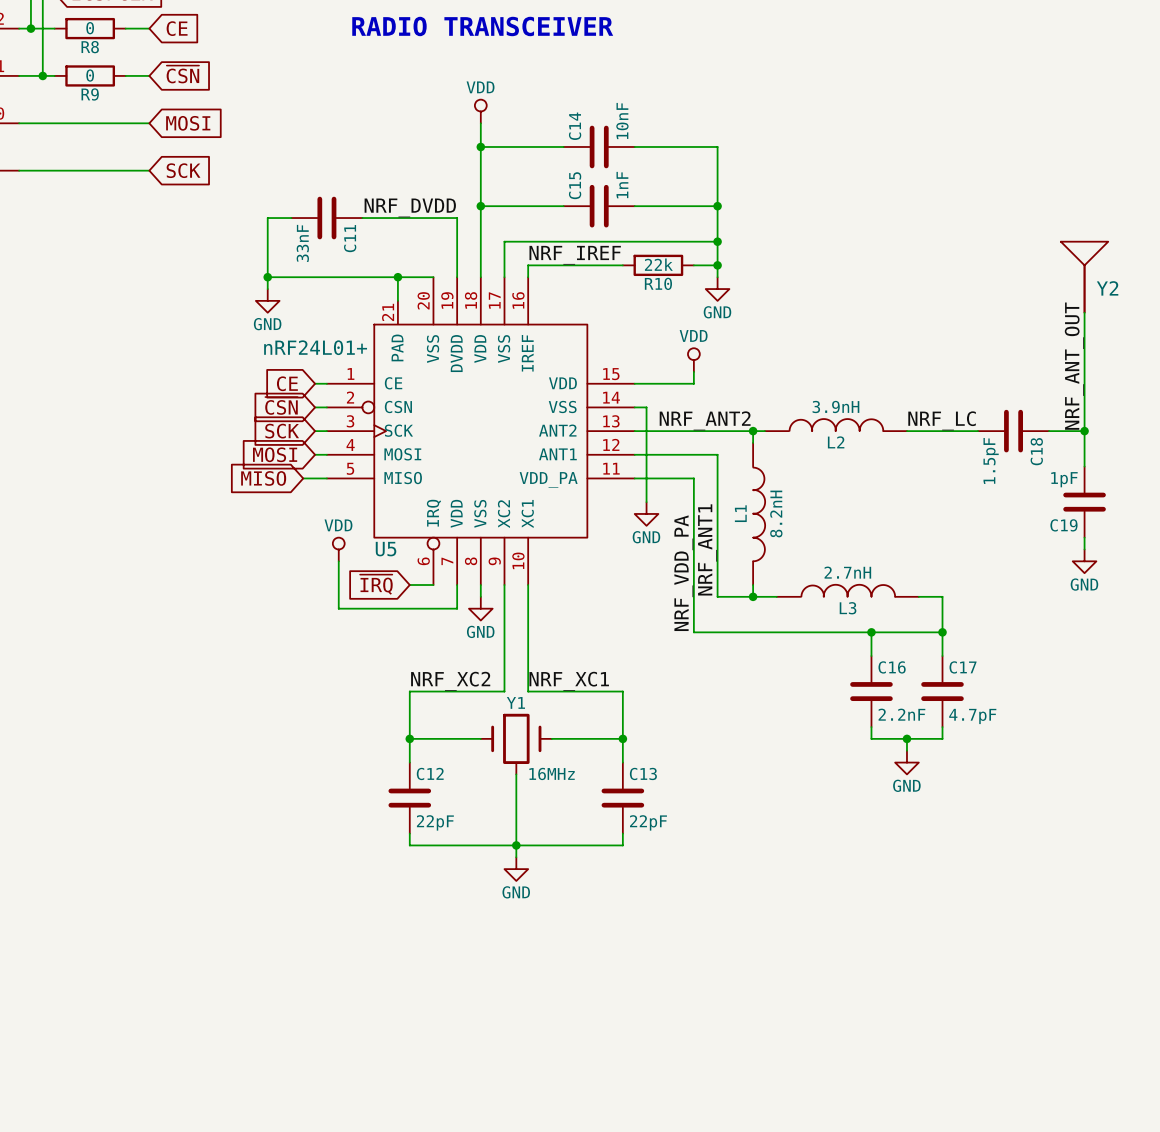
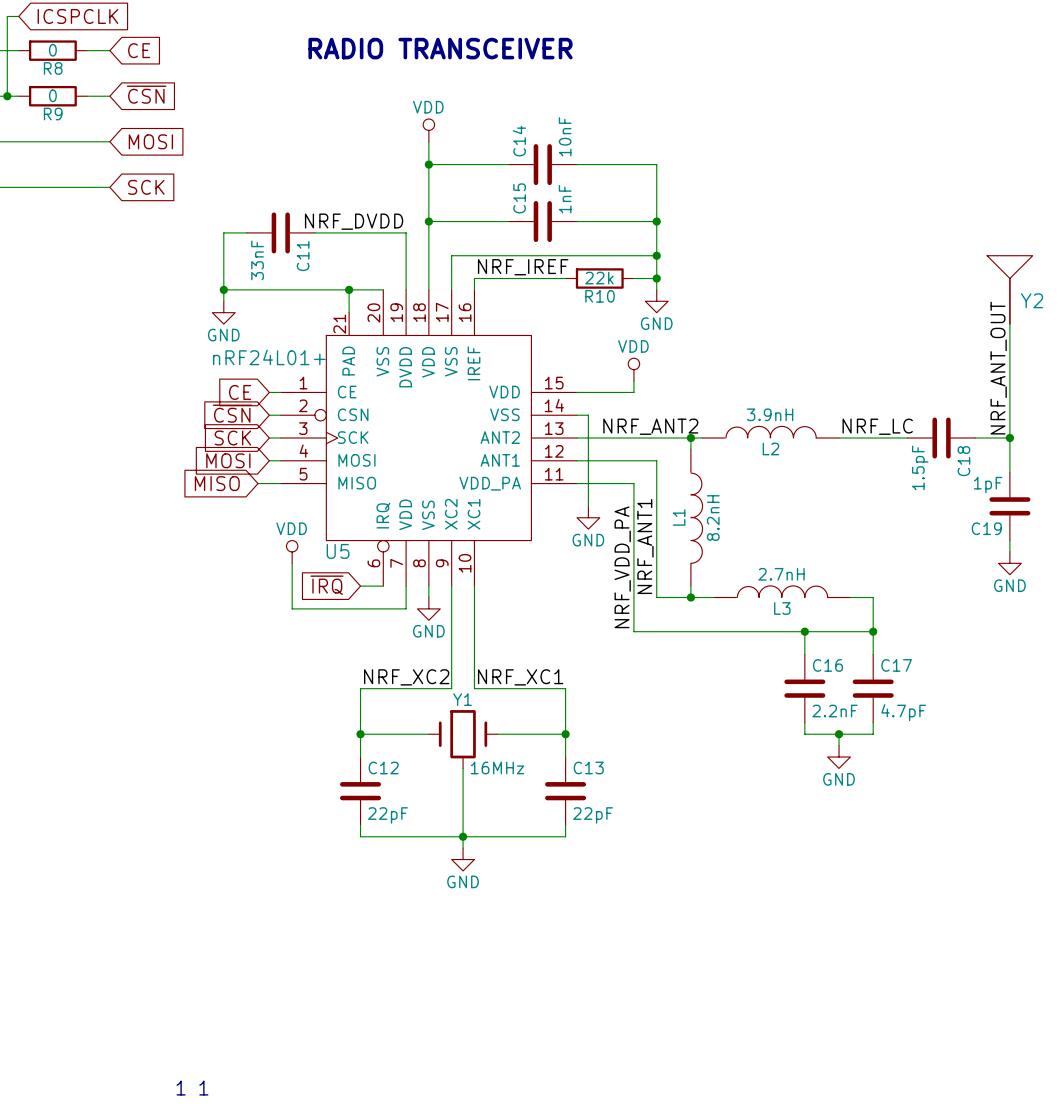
text: none -> 1 (181, 1088)
text: none -> 1 (203, 1088)

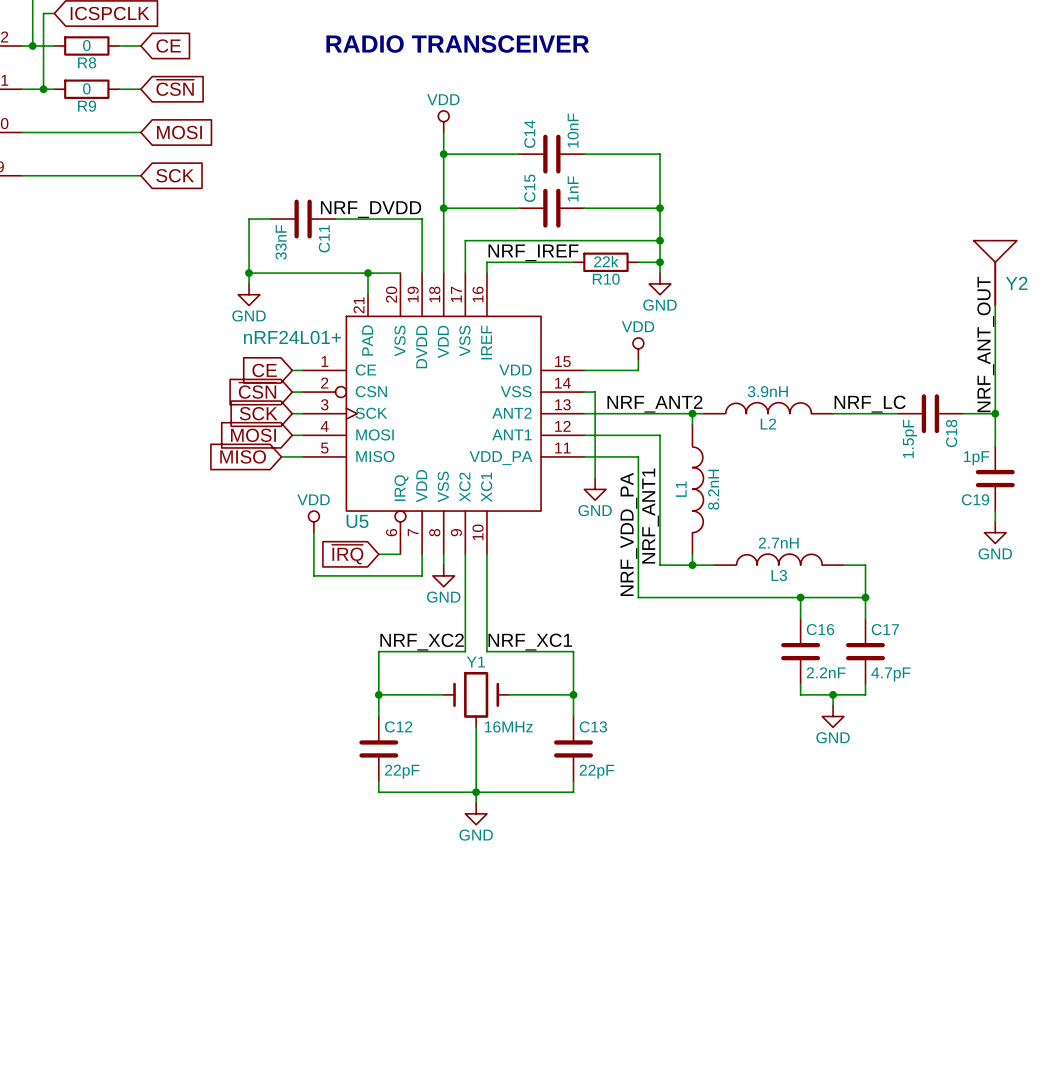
text: 1 (181, 1088) -> none
text: 1 (203, 1088) -> none

